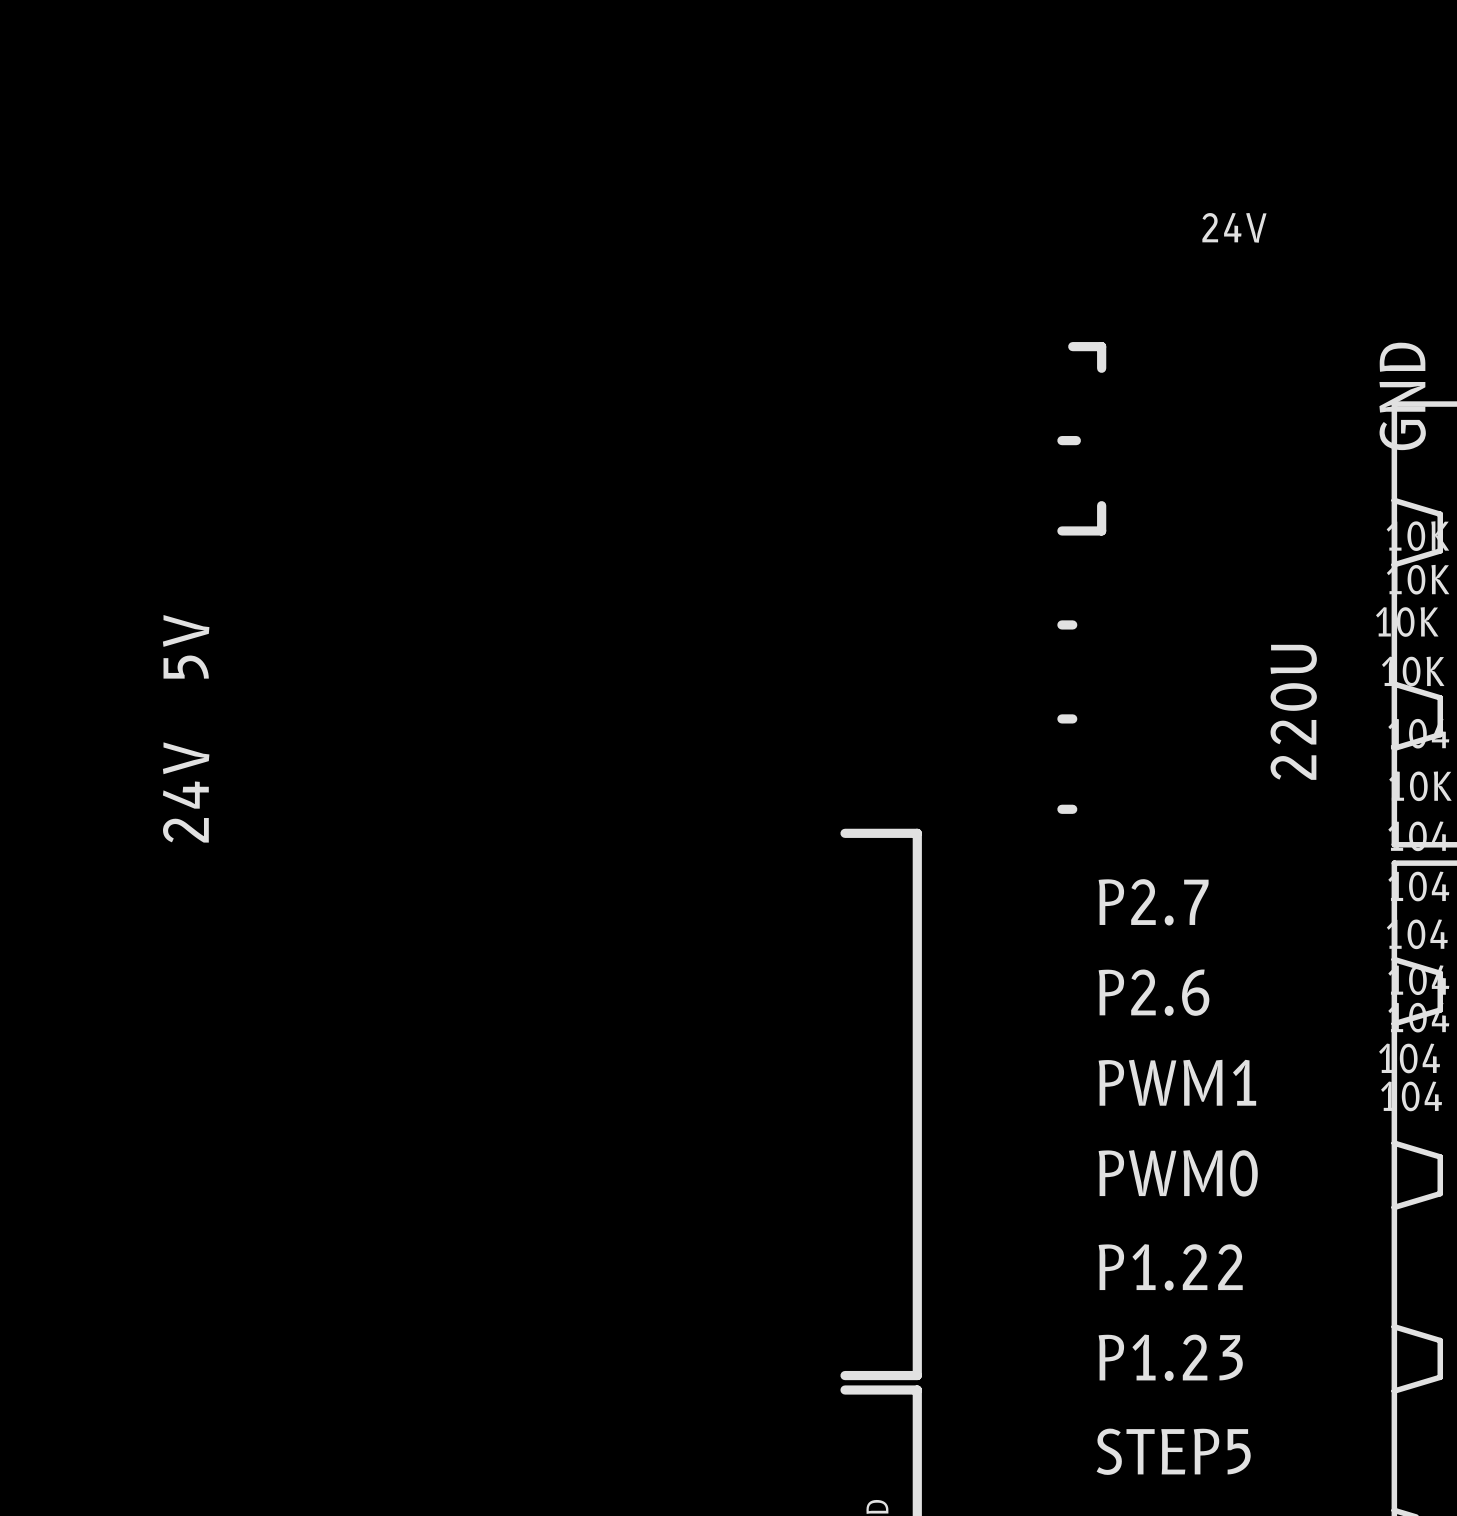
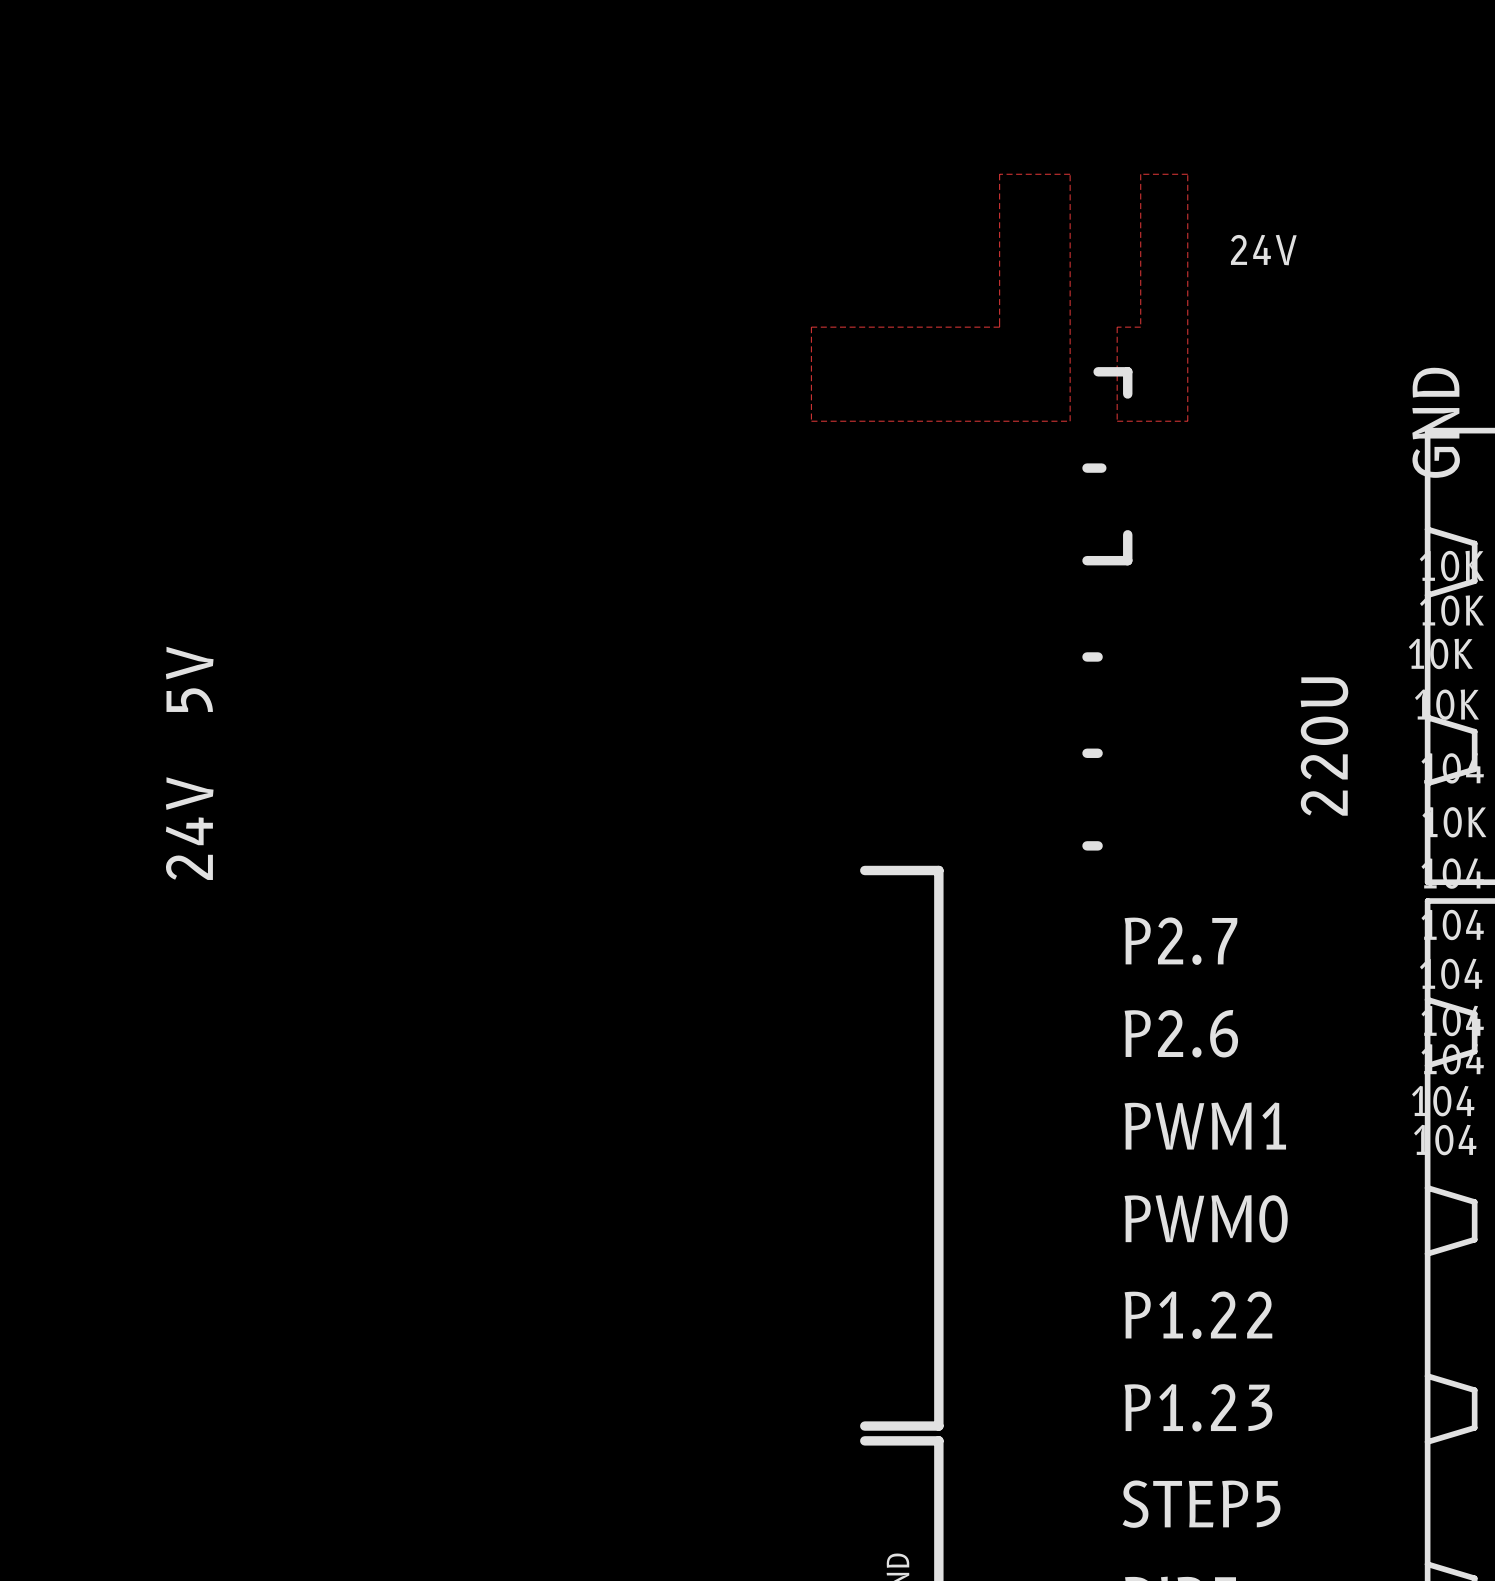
top zone outline: none -> (999, 174) (1070, 174) (1070, 421) (811, 421) (811, 327) (999, 327) (999, 174)
top zone outline: none -> (1140, 174) (1187, 174) (1187, 421) (1117, 421) (1117, 327) (1140, 327) (1140, 174)

